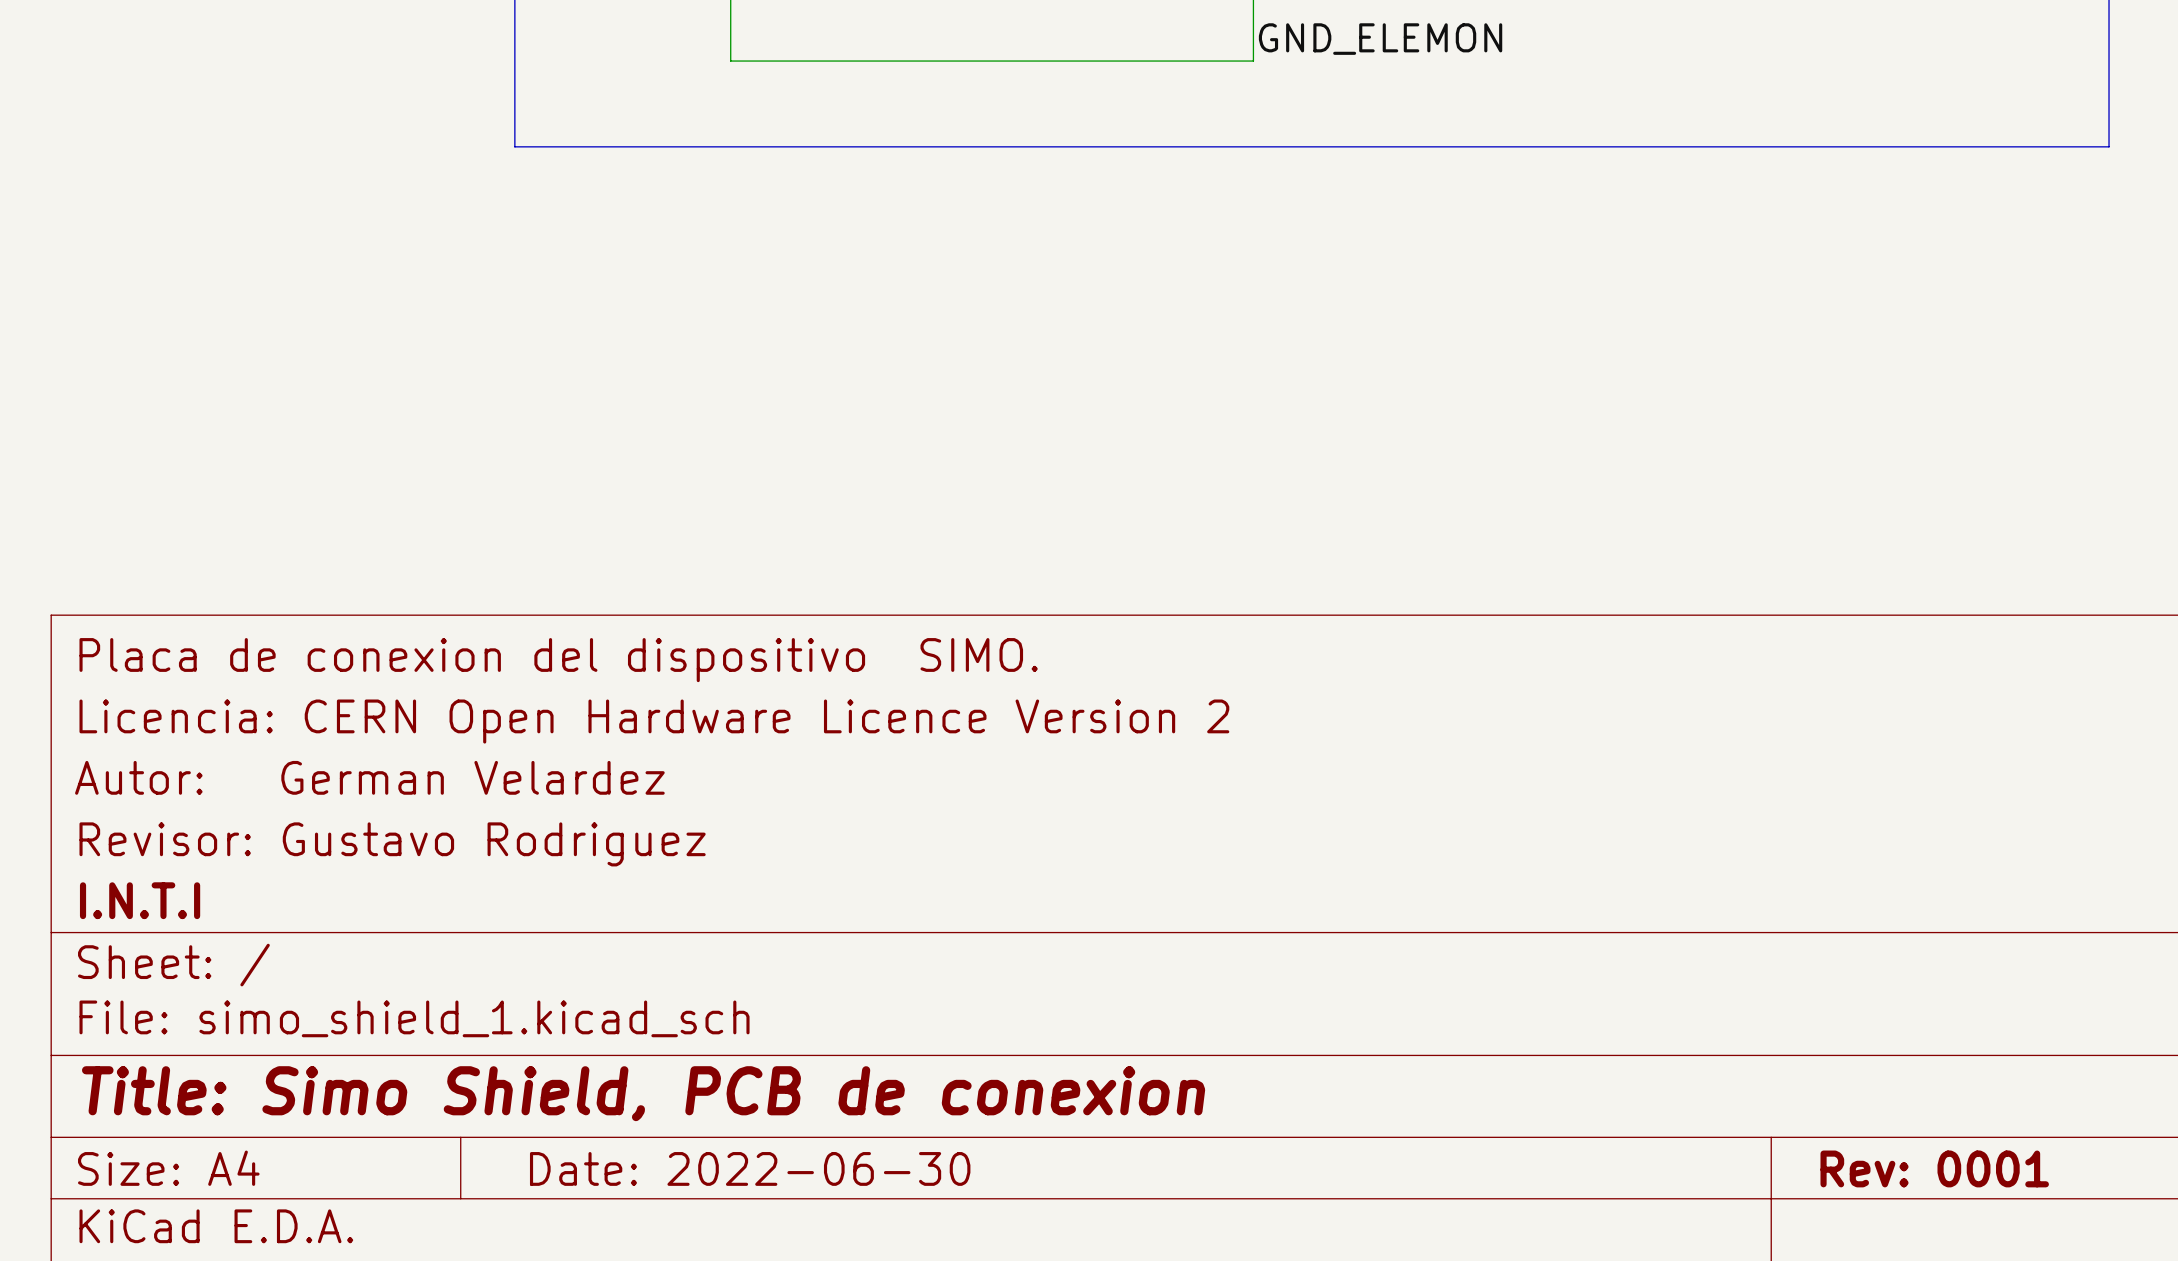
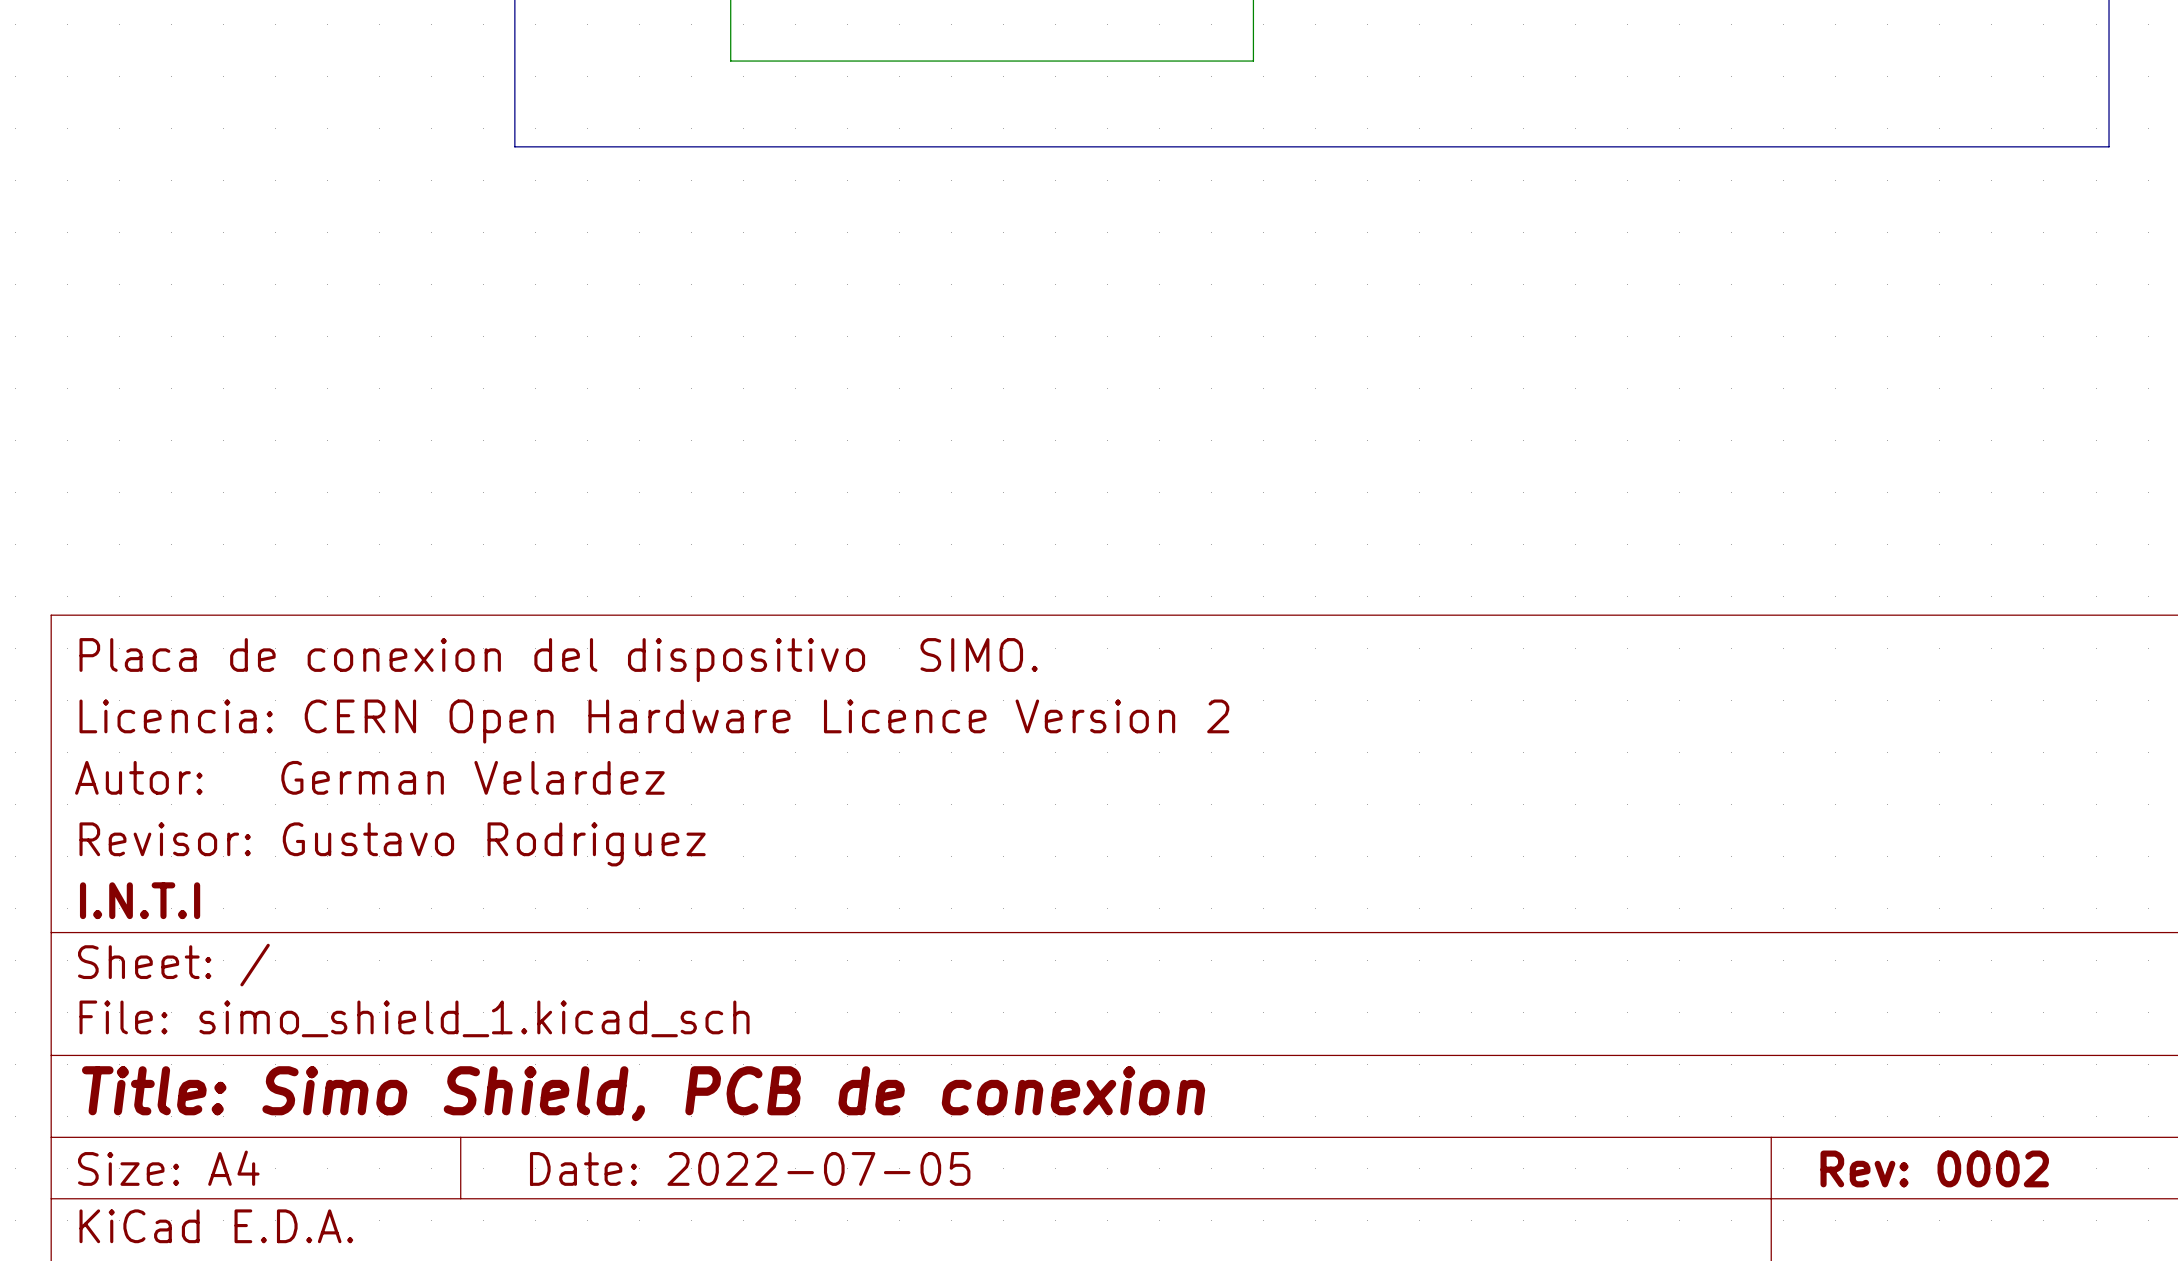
label: GND_ELEMON (1380, 39) -> none
title block: Date: 2022-06-30 (750, 1168) -> Date: 2022-07-05 (750, 1168)
title block: Rev: 0001 (1934, 1168) -> Rev: 0002 (1934, 1168)

